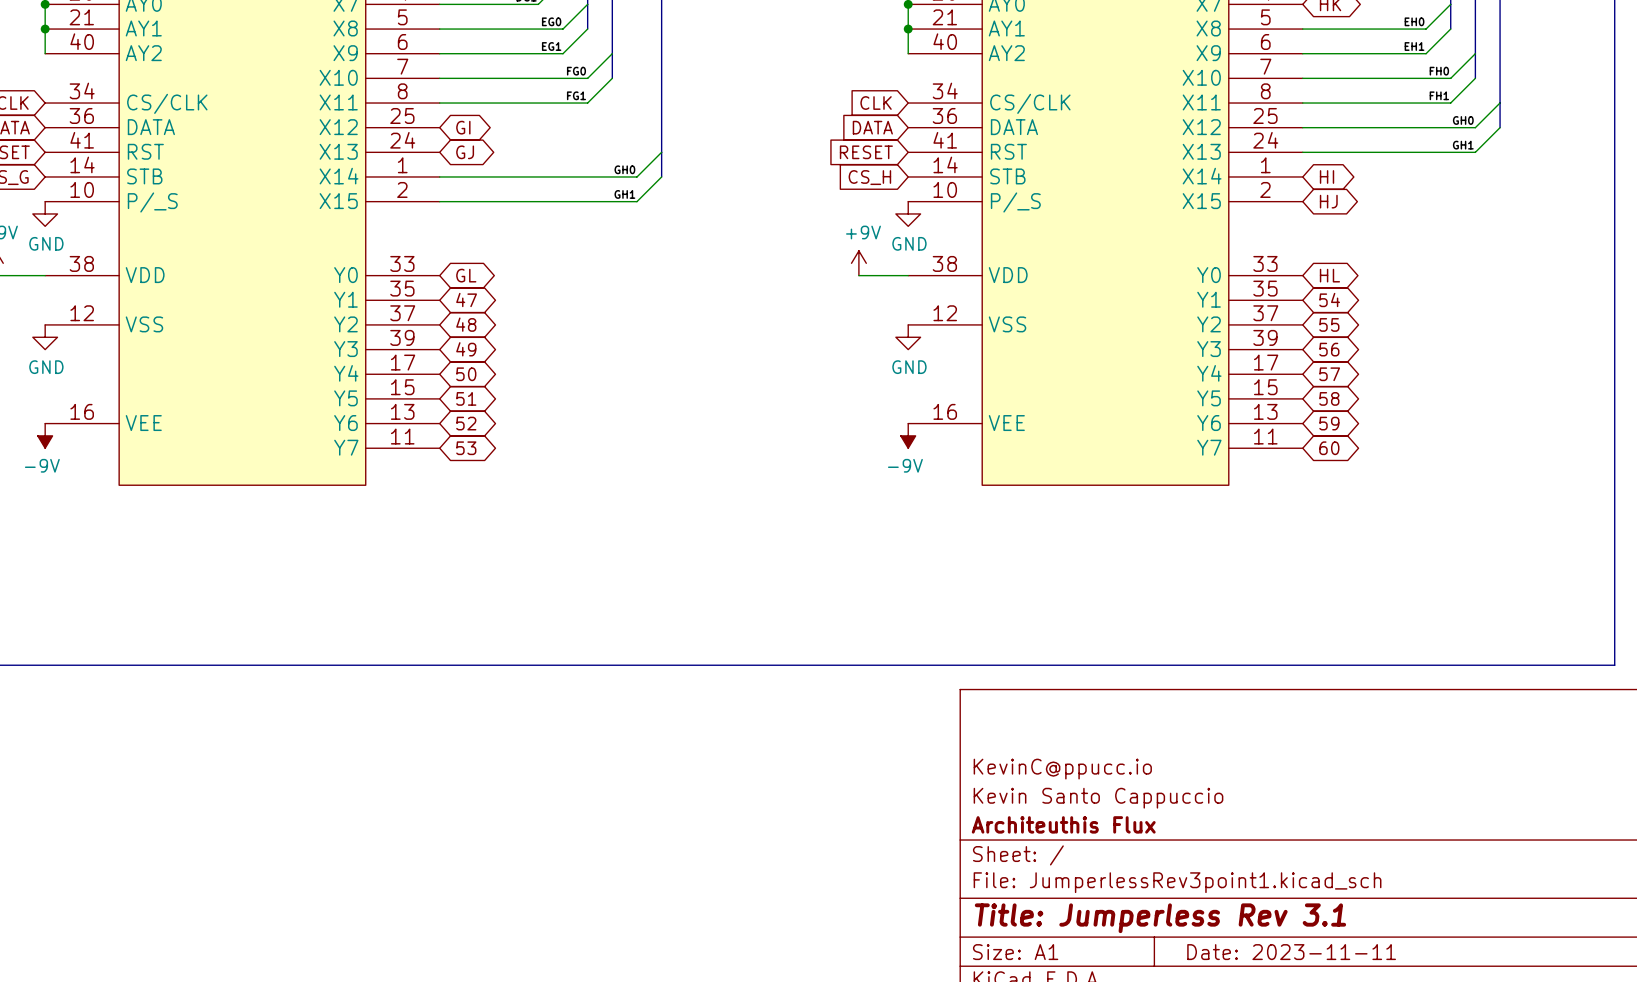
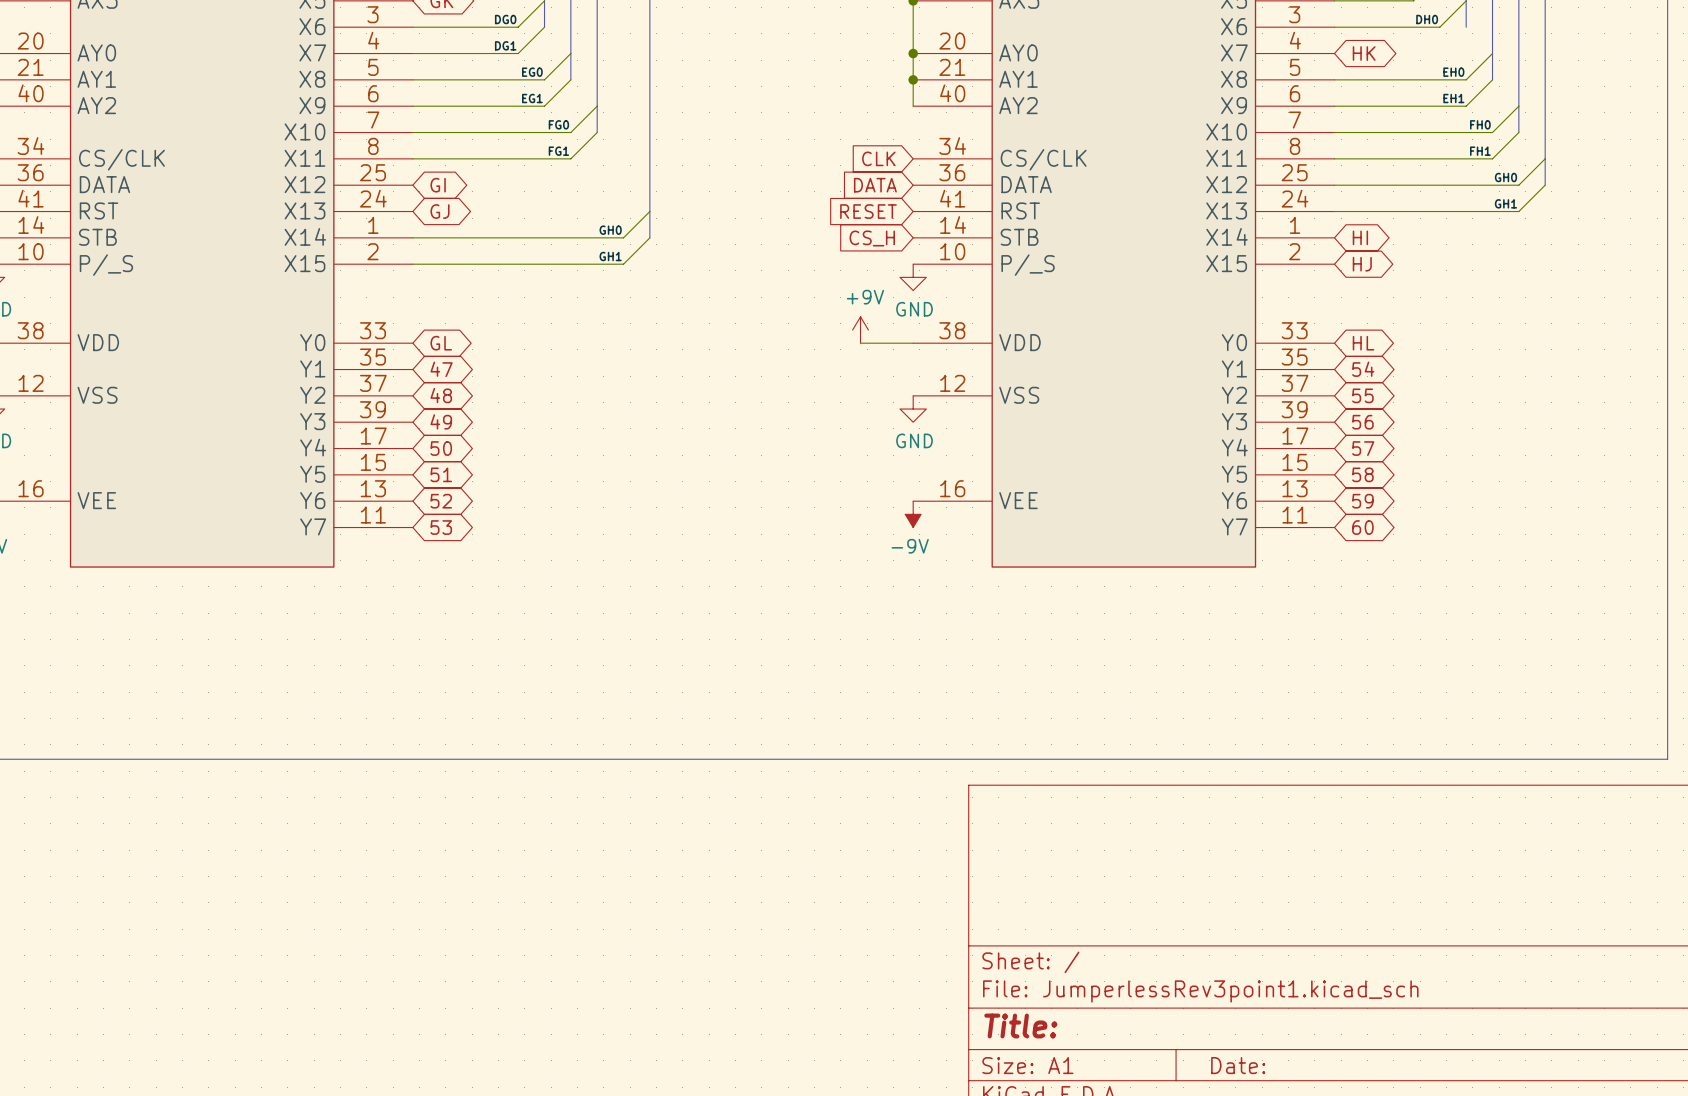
title block: KevinC@ppucc.io (1062, 769) -> none
title block: Kevin Santo Cappuccio (1098, 798) -> none
title block: Architeuthis Flux (1063, 824) -> none
title block: Title: Jumperless Rev 3.1 (1160, 918) -> Title: (1020, 1025)
title block: Date: 2023-11-11 (1291, 952) -> Date: (1238, 1065)

